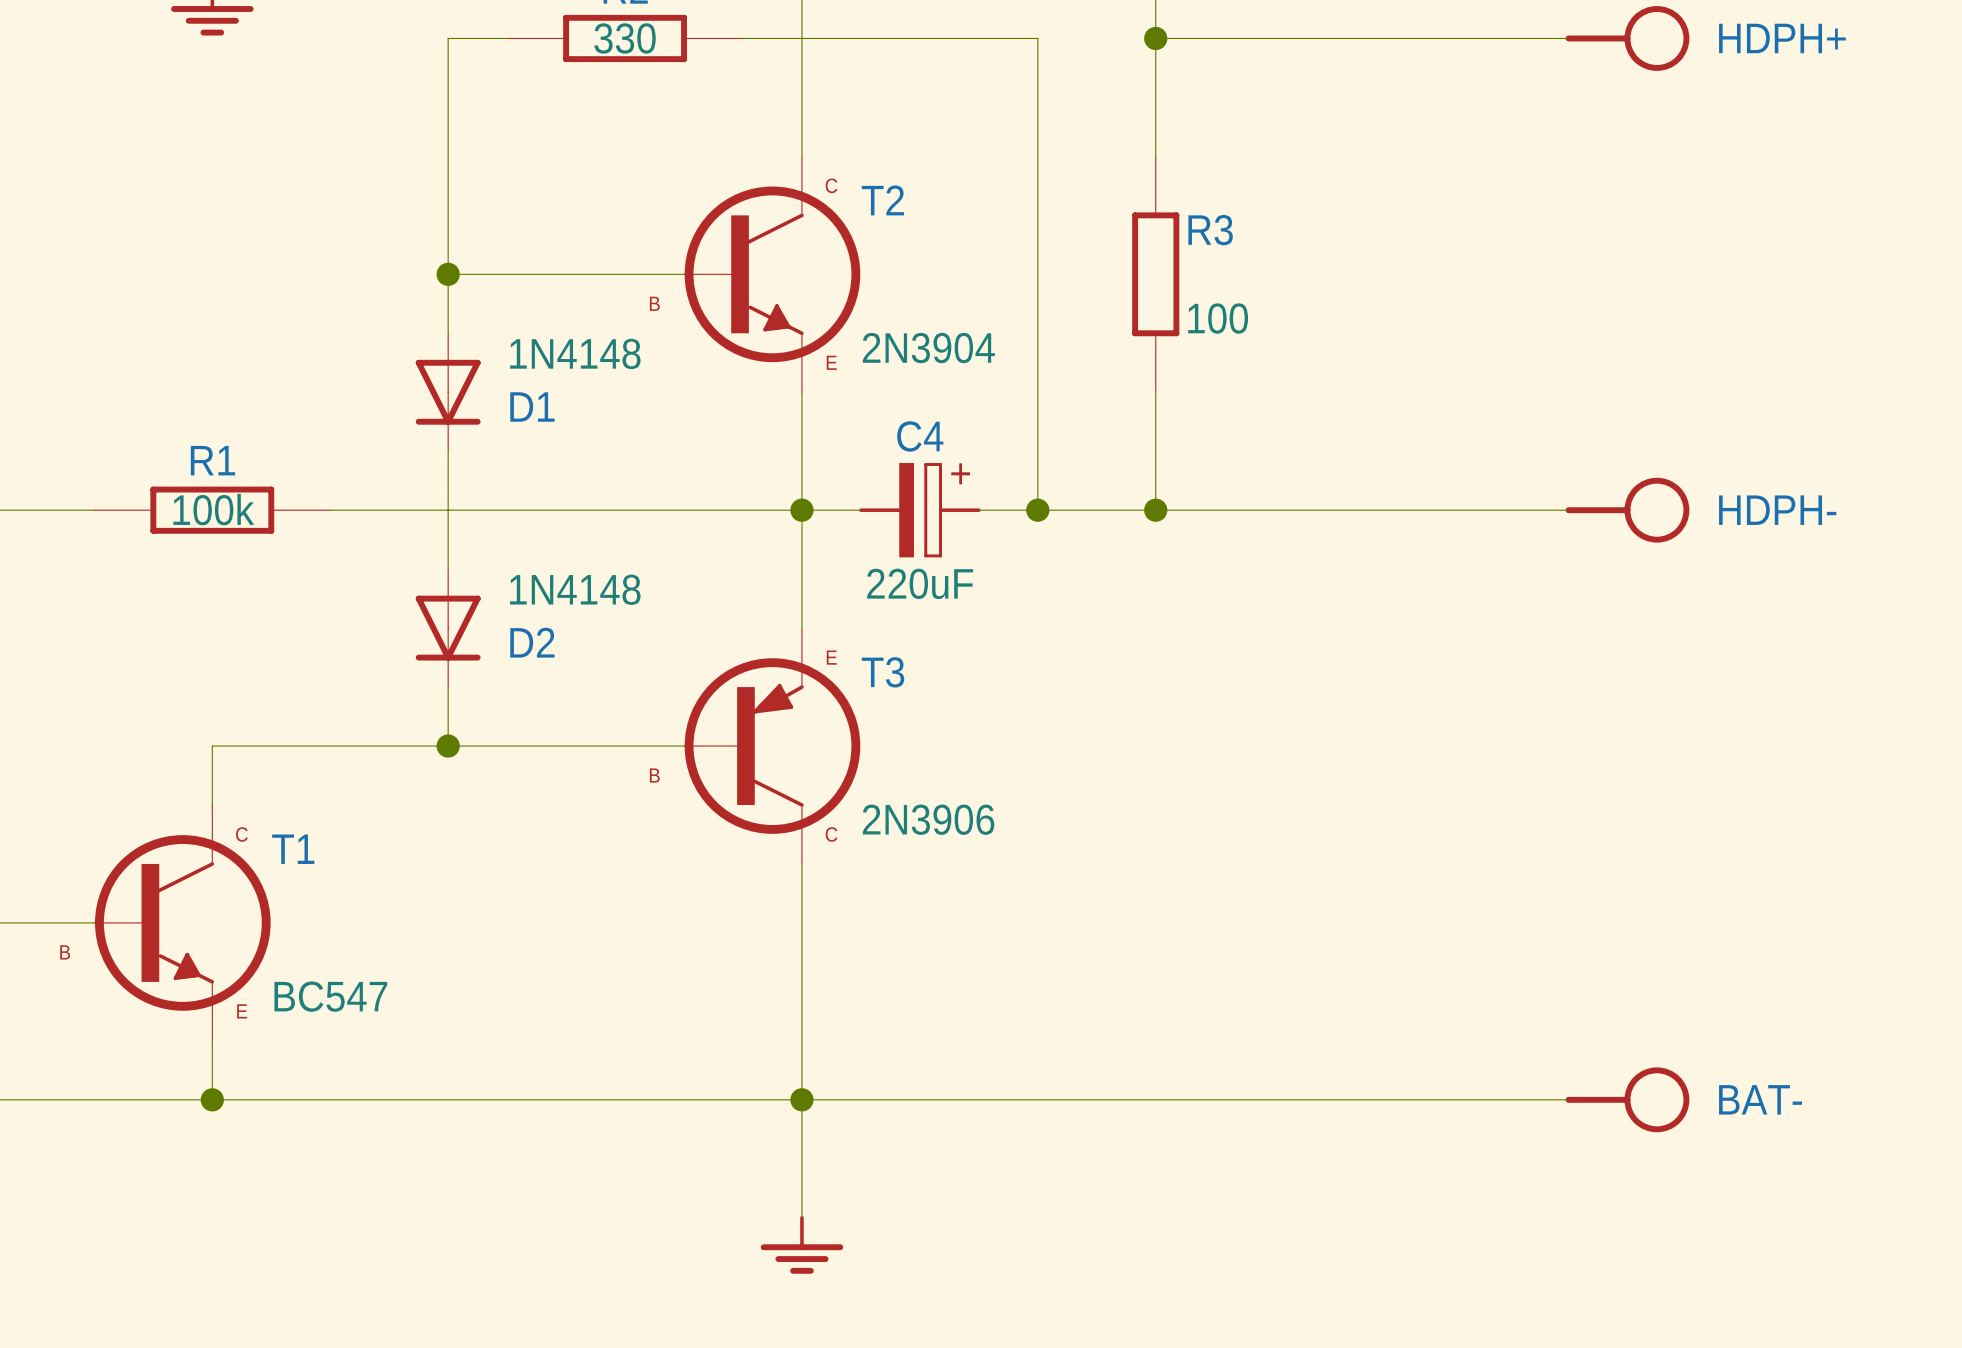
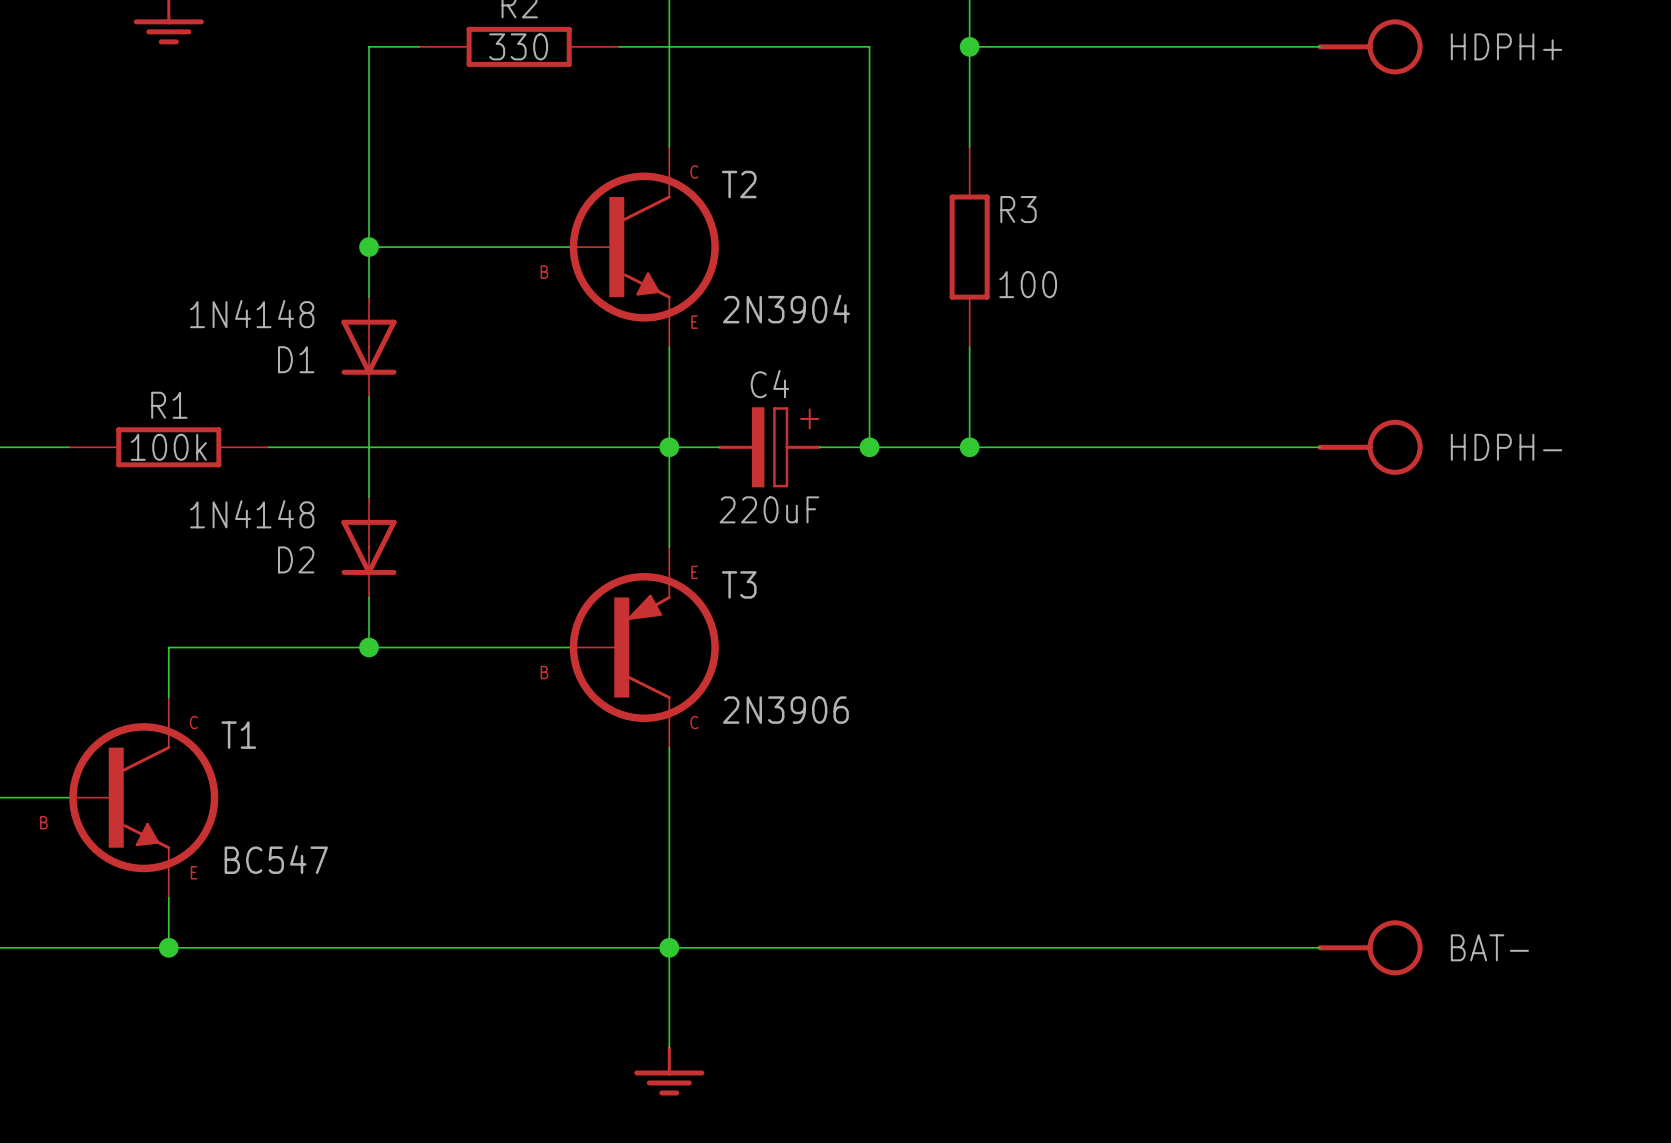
D1 value position: 1N4148 (575, 353) -> 1N4148 (252, 314)
D1 name position: D1 (532, 407) -> D1 (296, 359)
D2 value position: 1N4148 (575, 589) -> 1N4148 (252, 514)
D2 name position: D2 (532, 642) -> D2 (296, 559)

